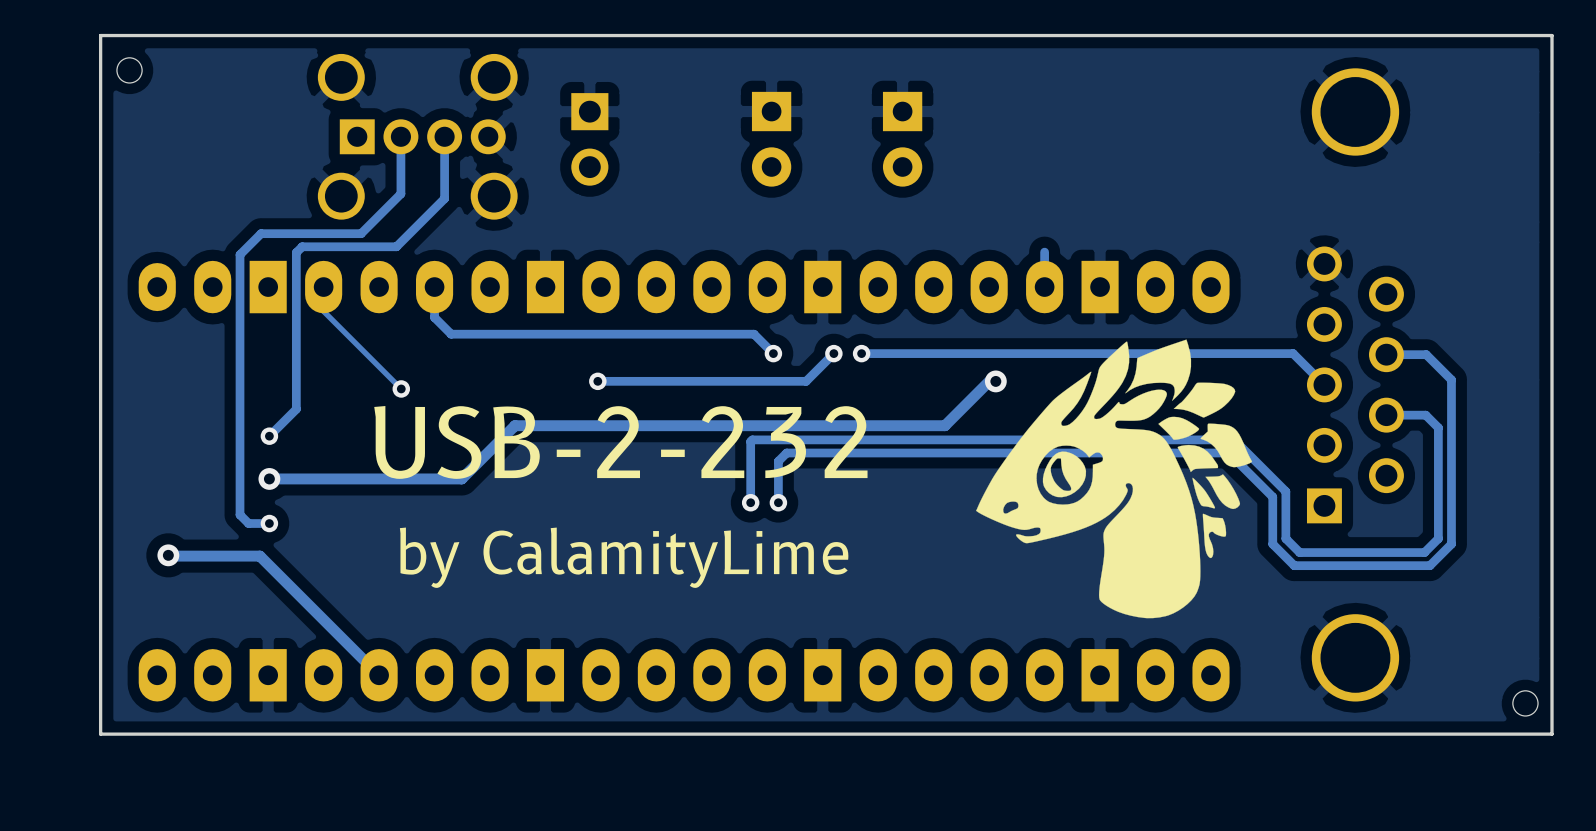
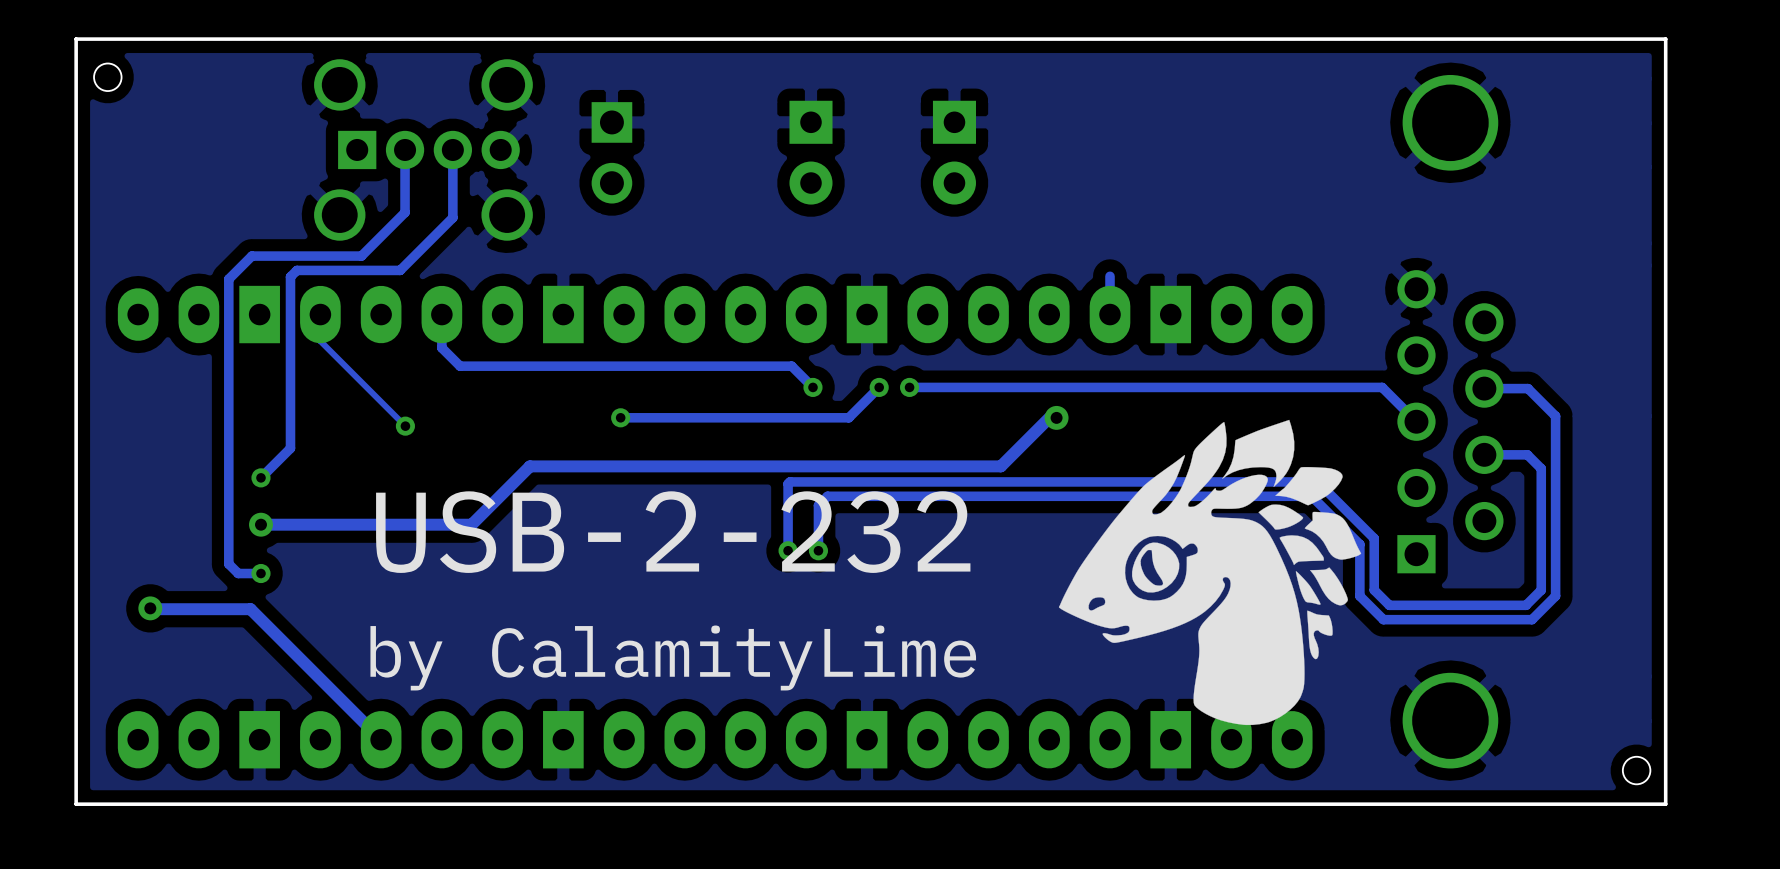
text position: USB-2-232 (620, 442) -> USB-2-232 (673, 532)
drawing position: (1114, 478) -> (1210, 572)
text position: by CalamityLime (624, 557) -> by CalamityLime (673, 657)

